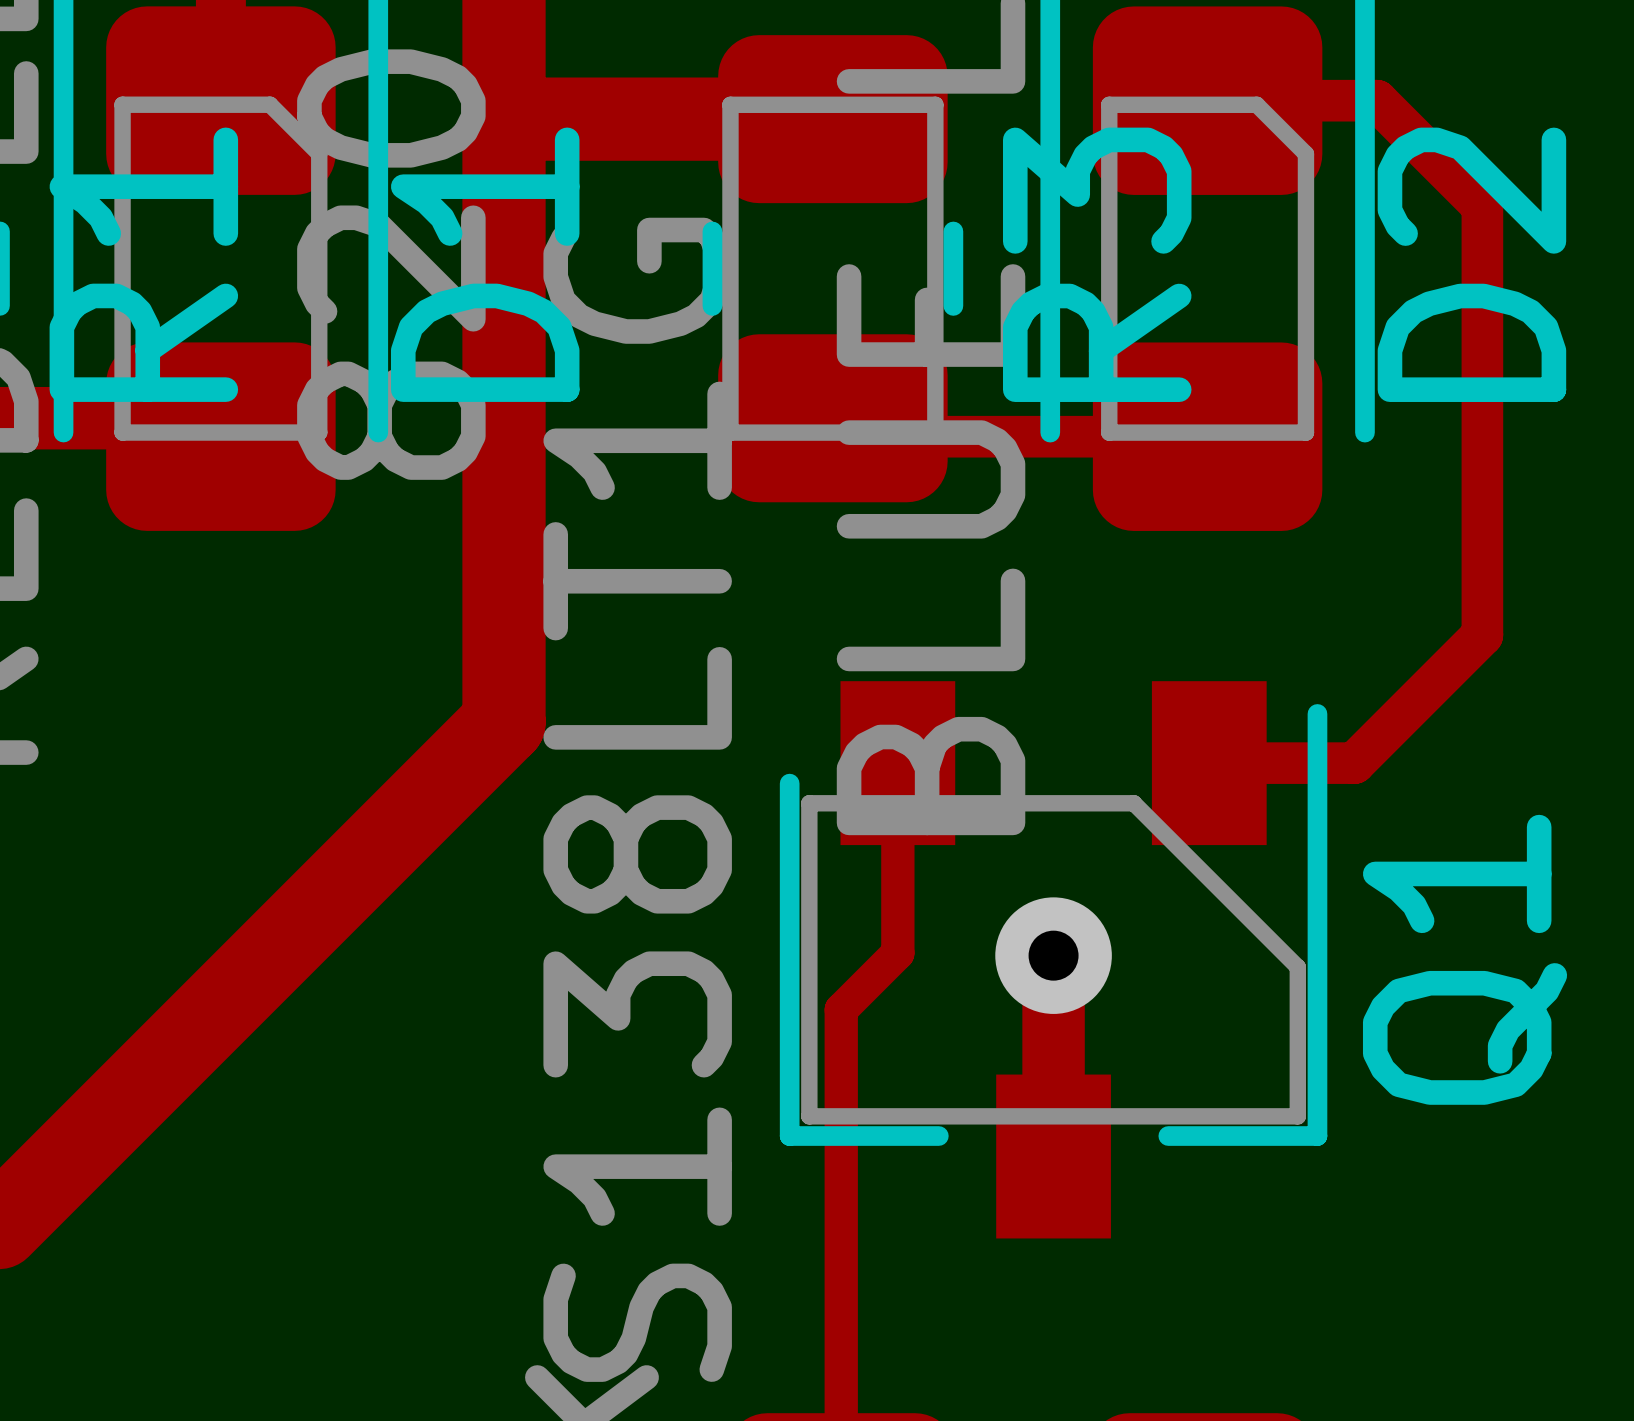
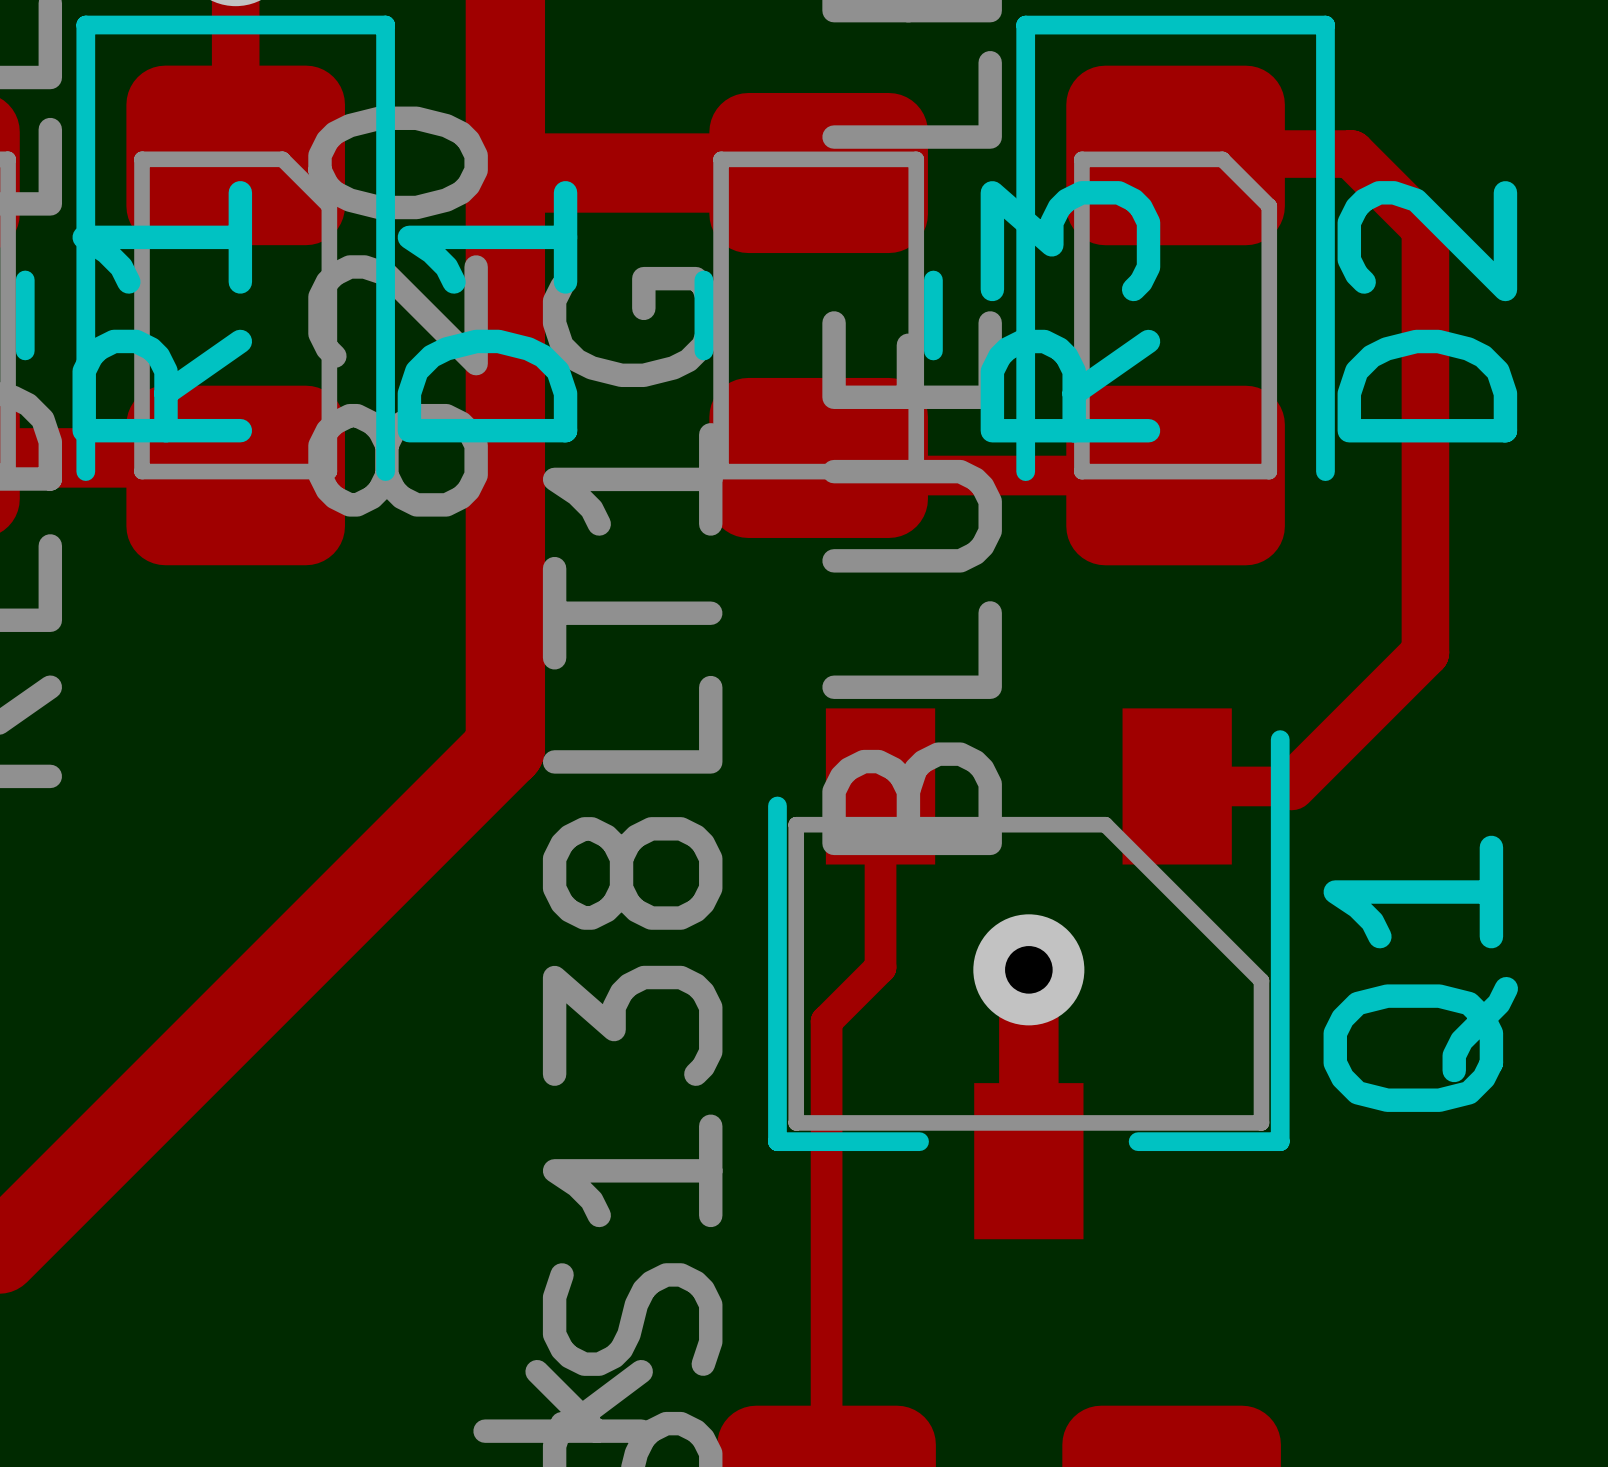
top track: (1207, 100) (1376, 100) (1482, 206) (1482, 635) (1354, 763) (1329, 763) -> (1183, 154) (1351, 154) (1425, 228) (1425, 652) (1291, 786)

